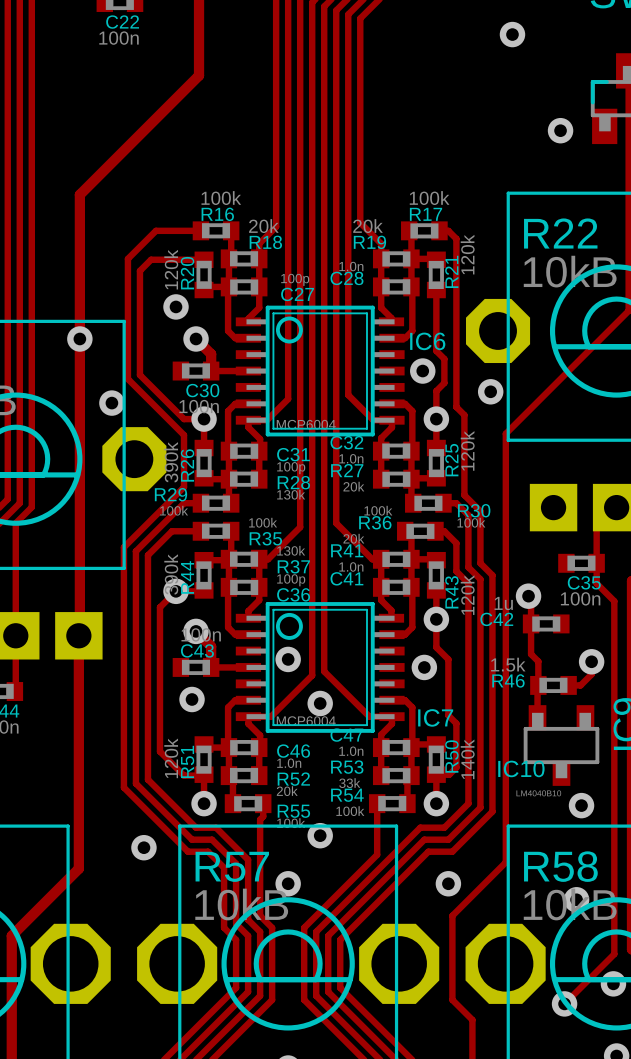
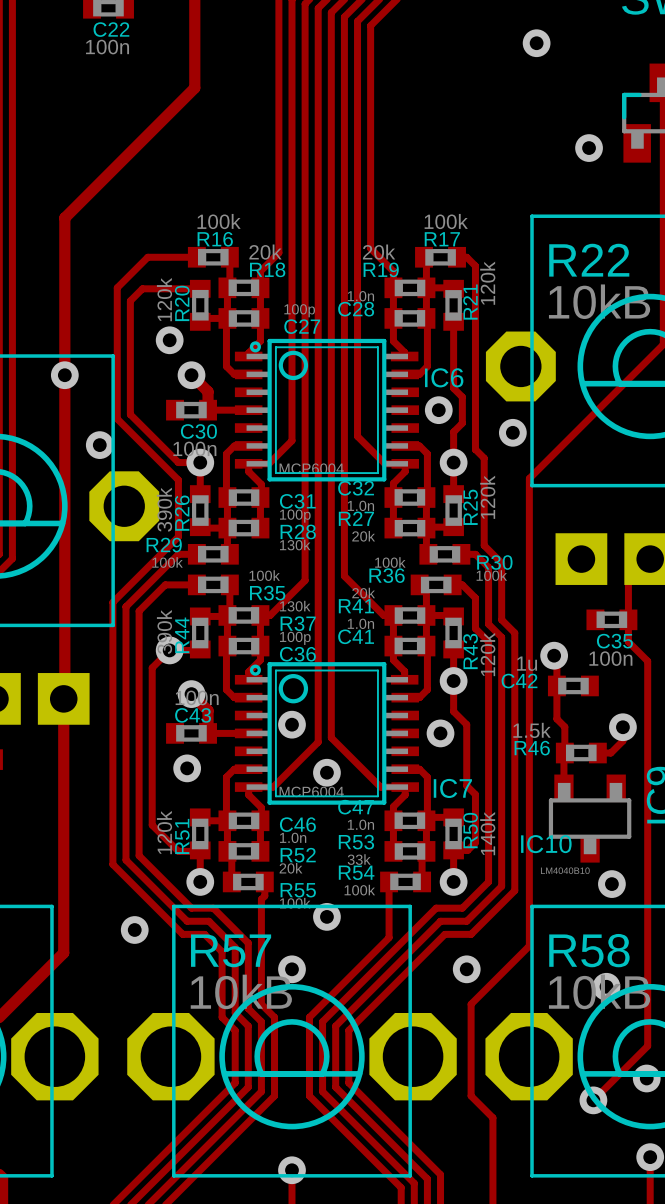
IC6 footprint: [235, 305, 405, 437] -> [234, 338, 419, 482]
IC7 footprint: [235, 602, 405, 733] -> [234, 662, 419, 805]

